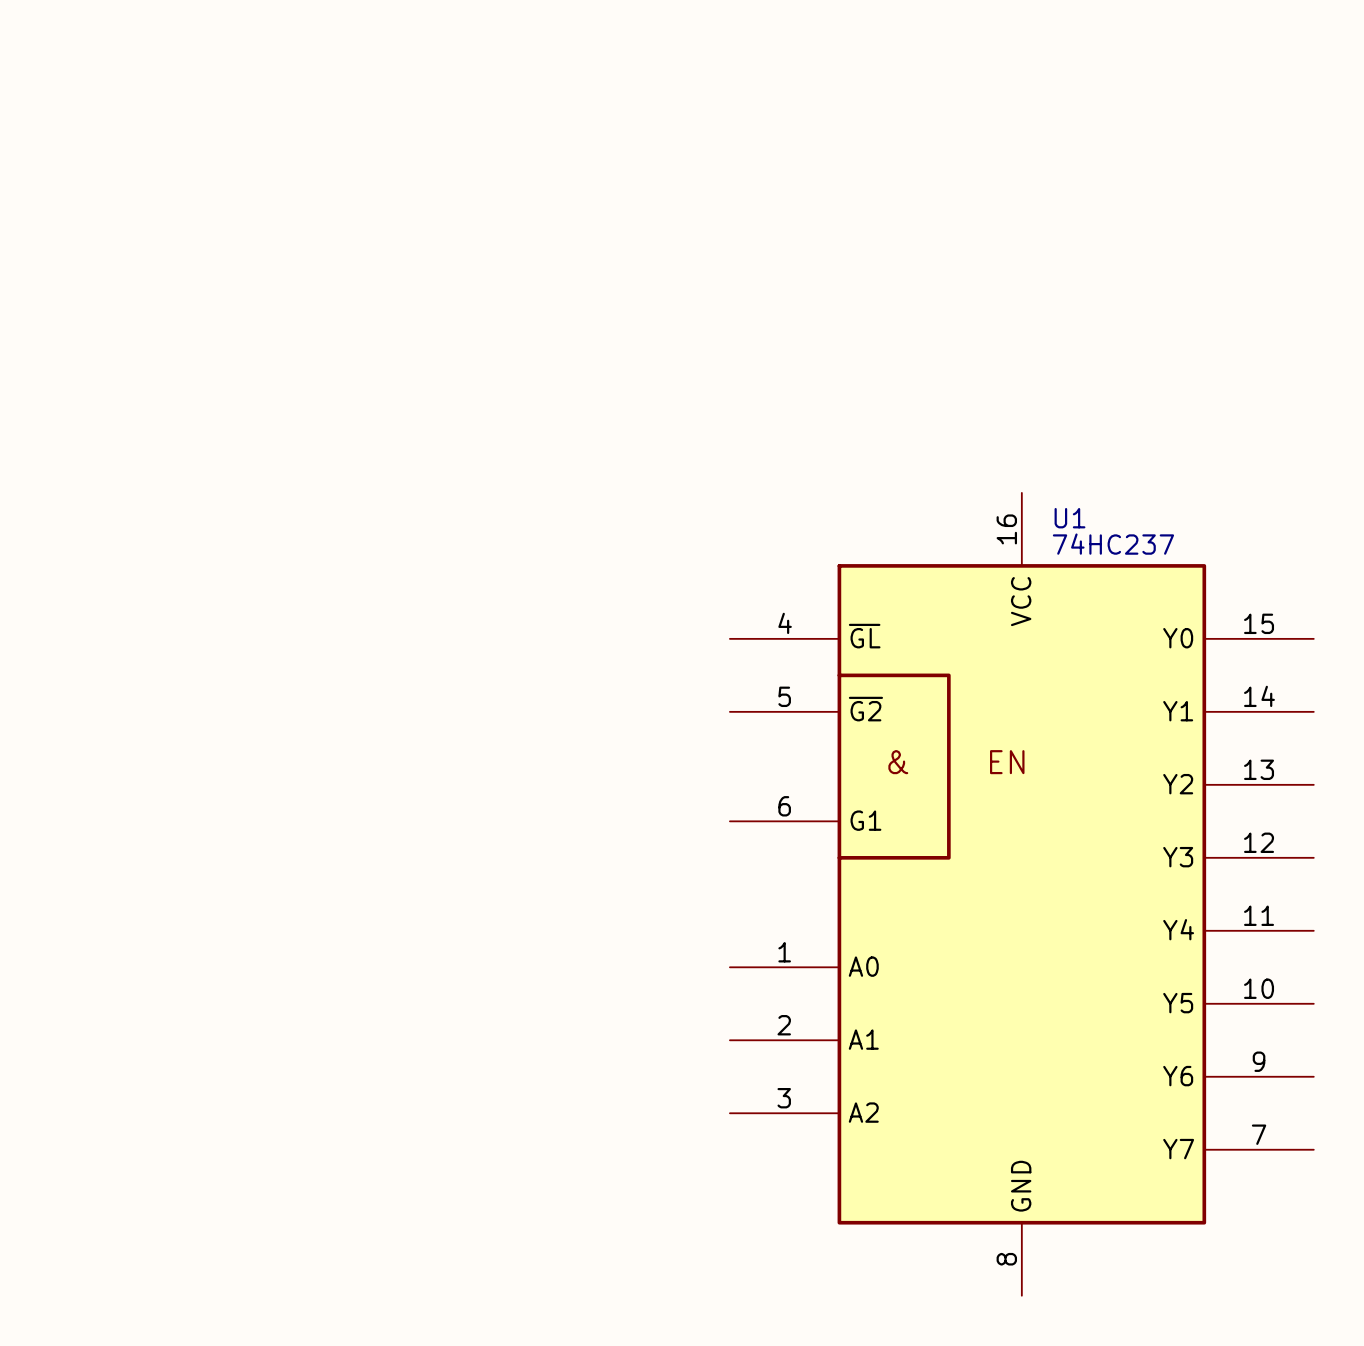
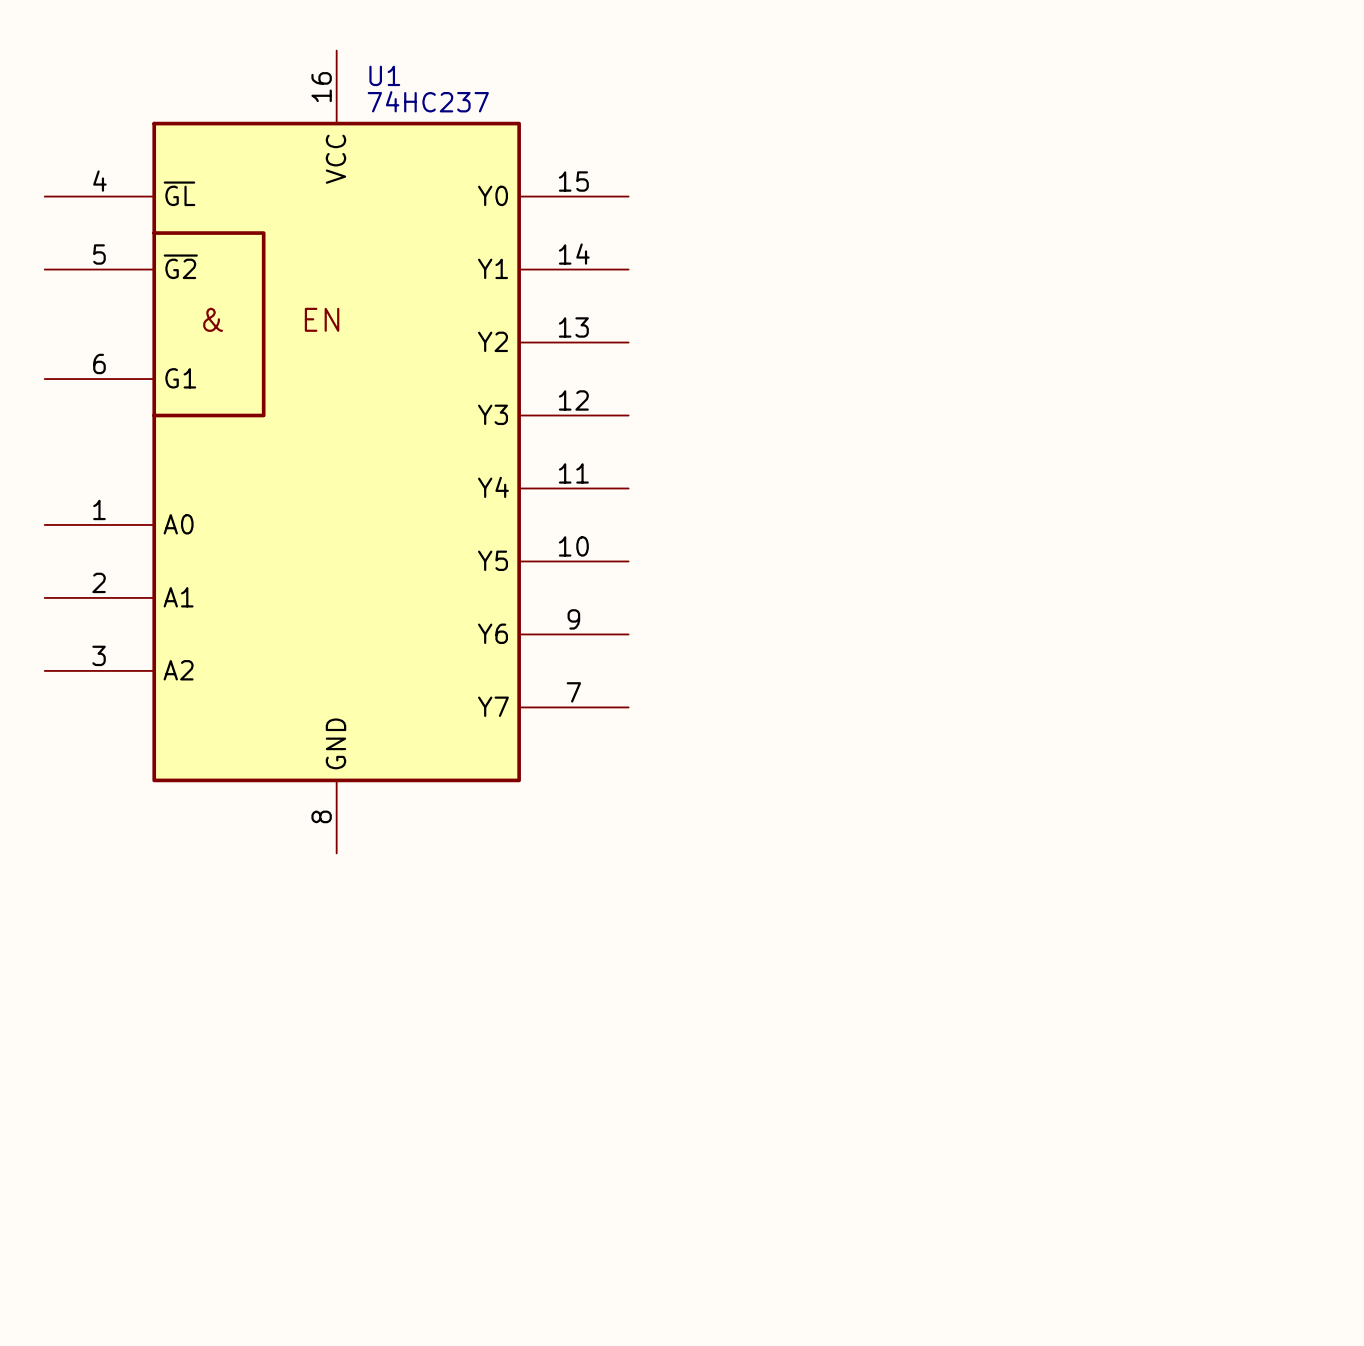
U1 symbol: [729, 492, 1314, 1296] -> [44, 50, 629, 854]

